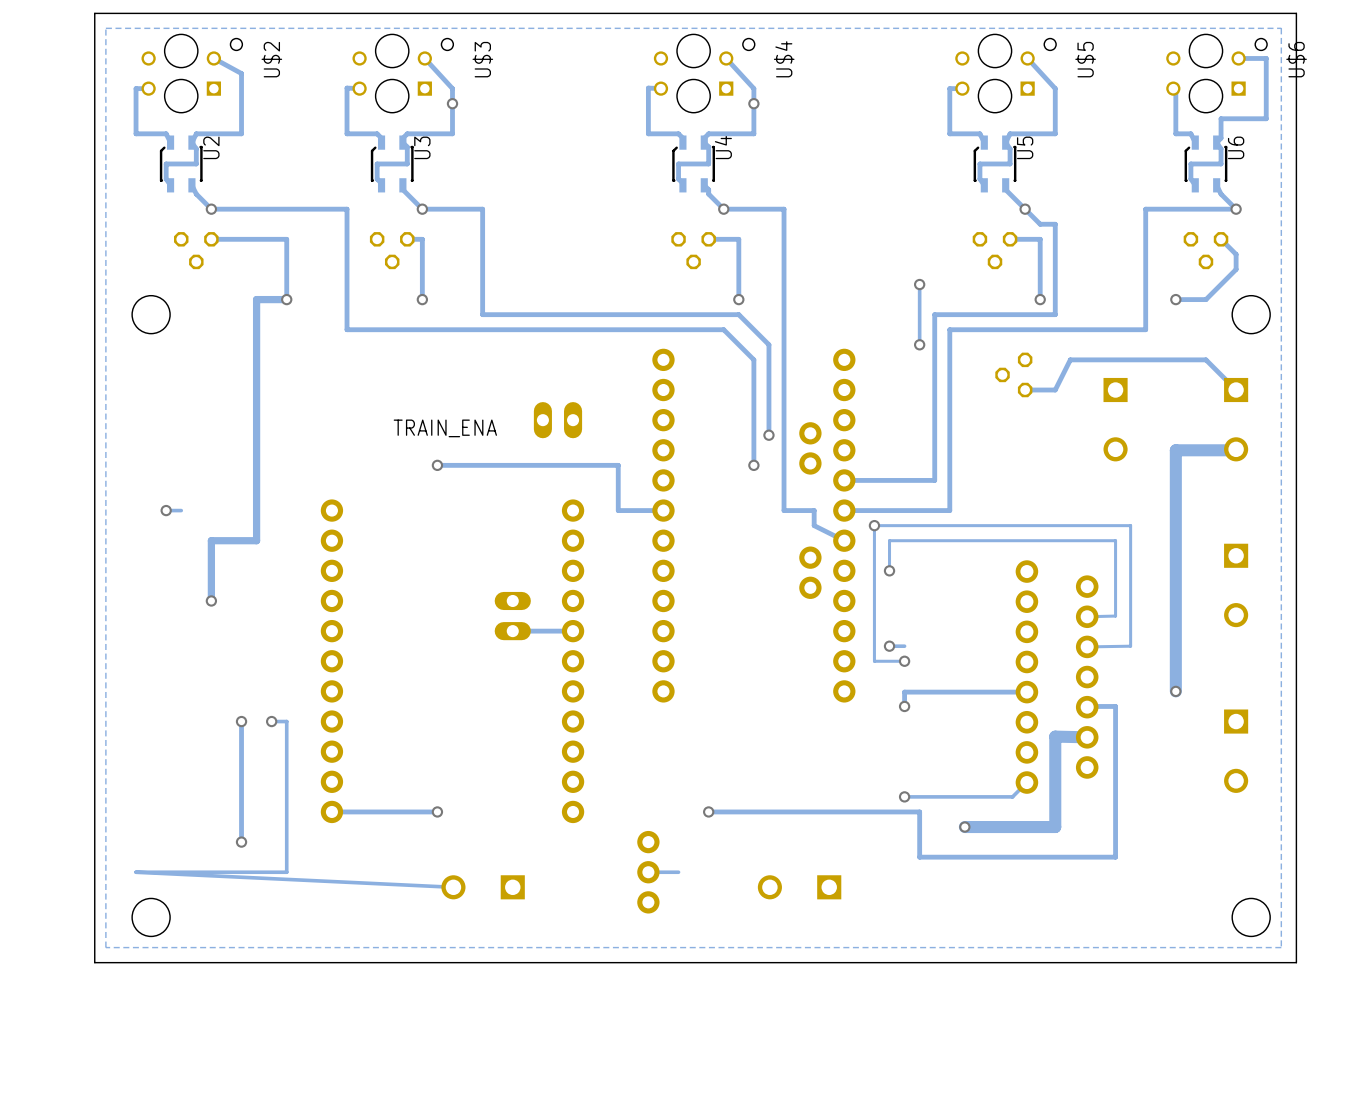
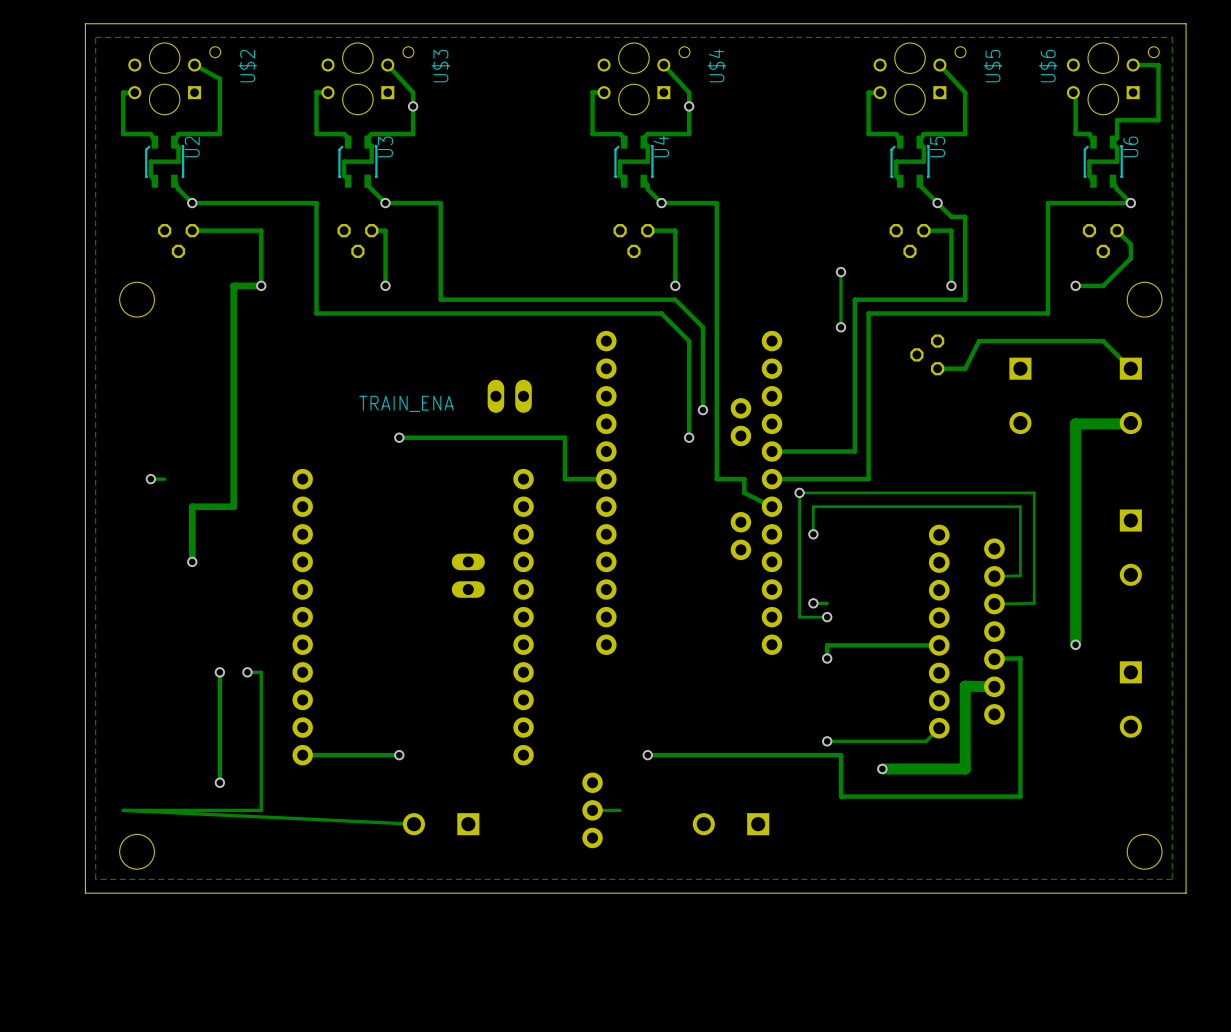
U$6 name position: U$6 (1296, 59) -> U$6 (1048, 66)
track: (573, 631) (512, 631) -> none

